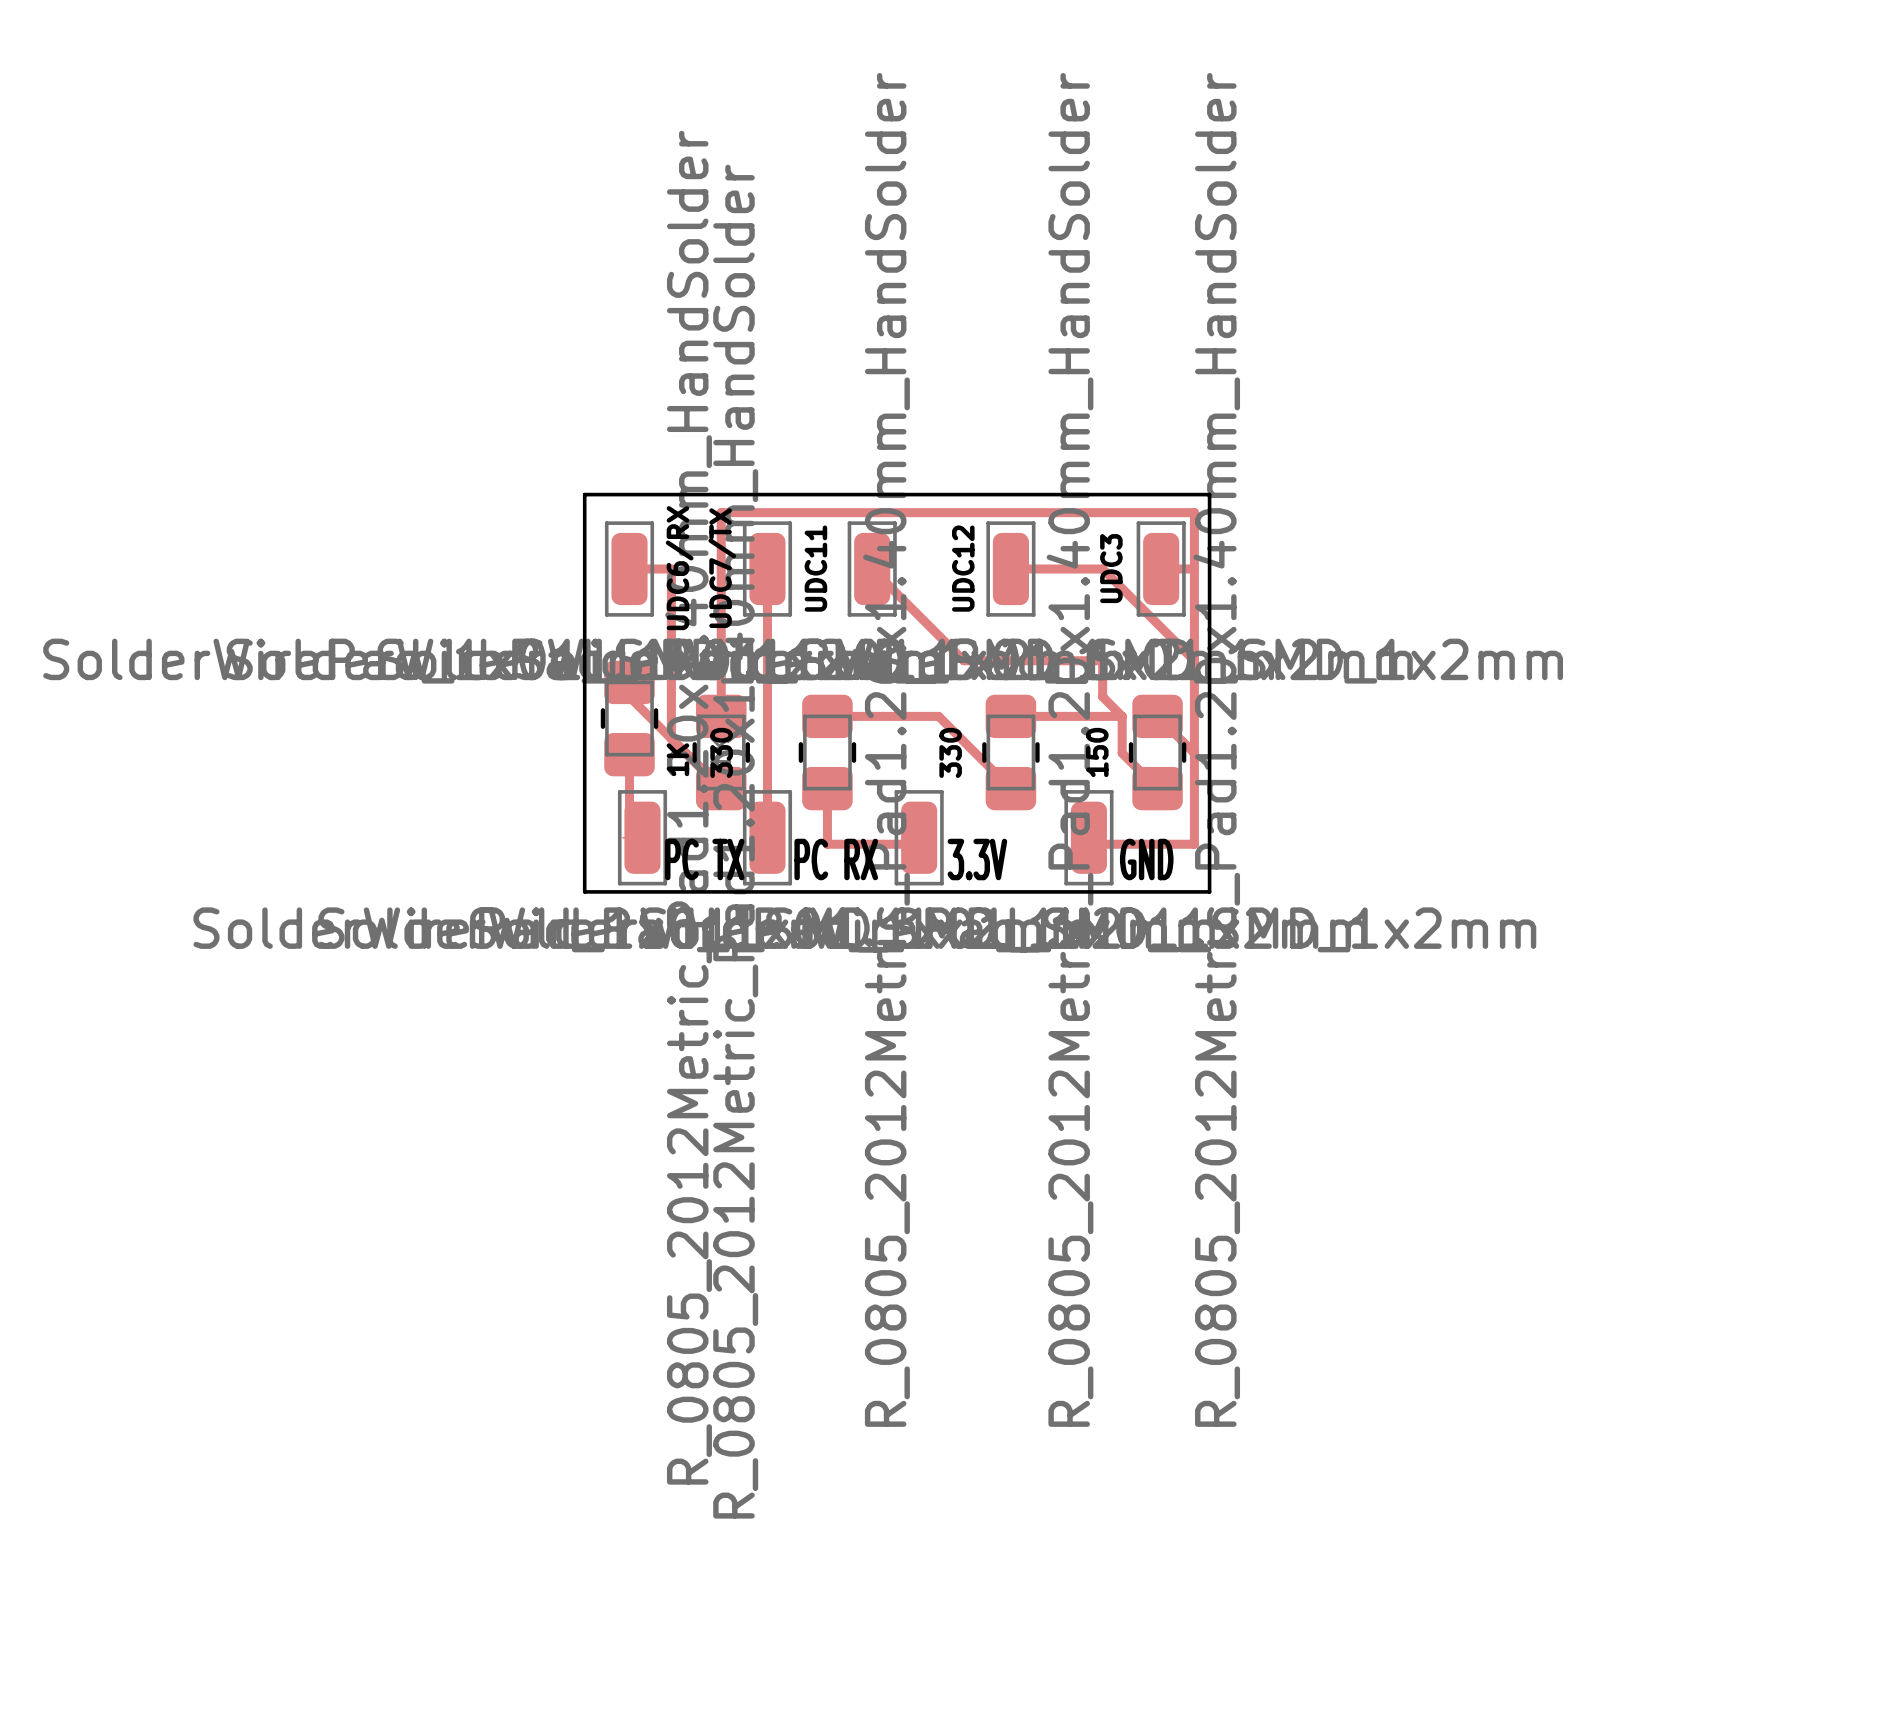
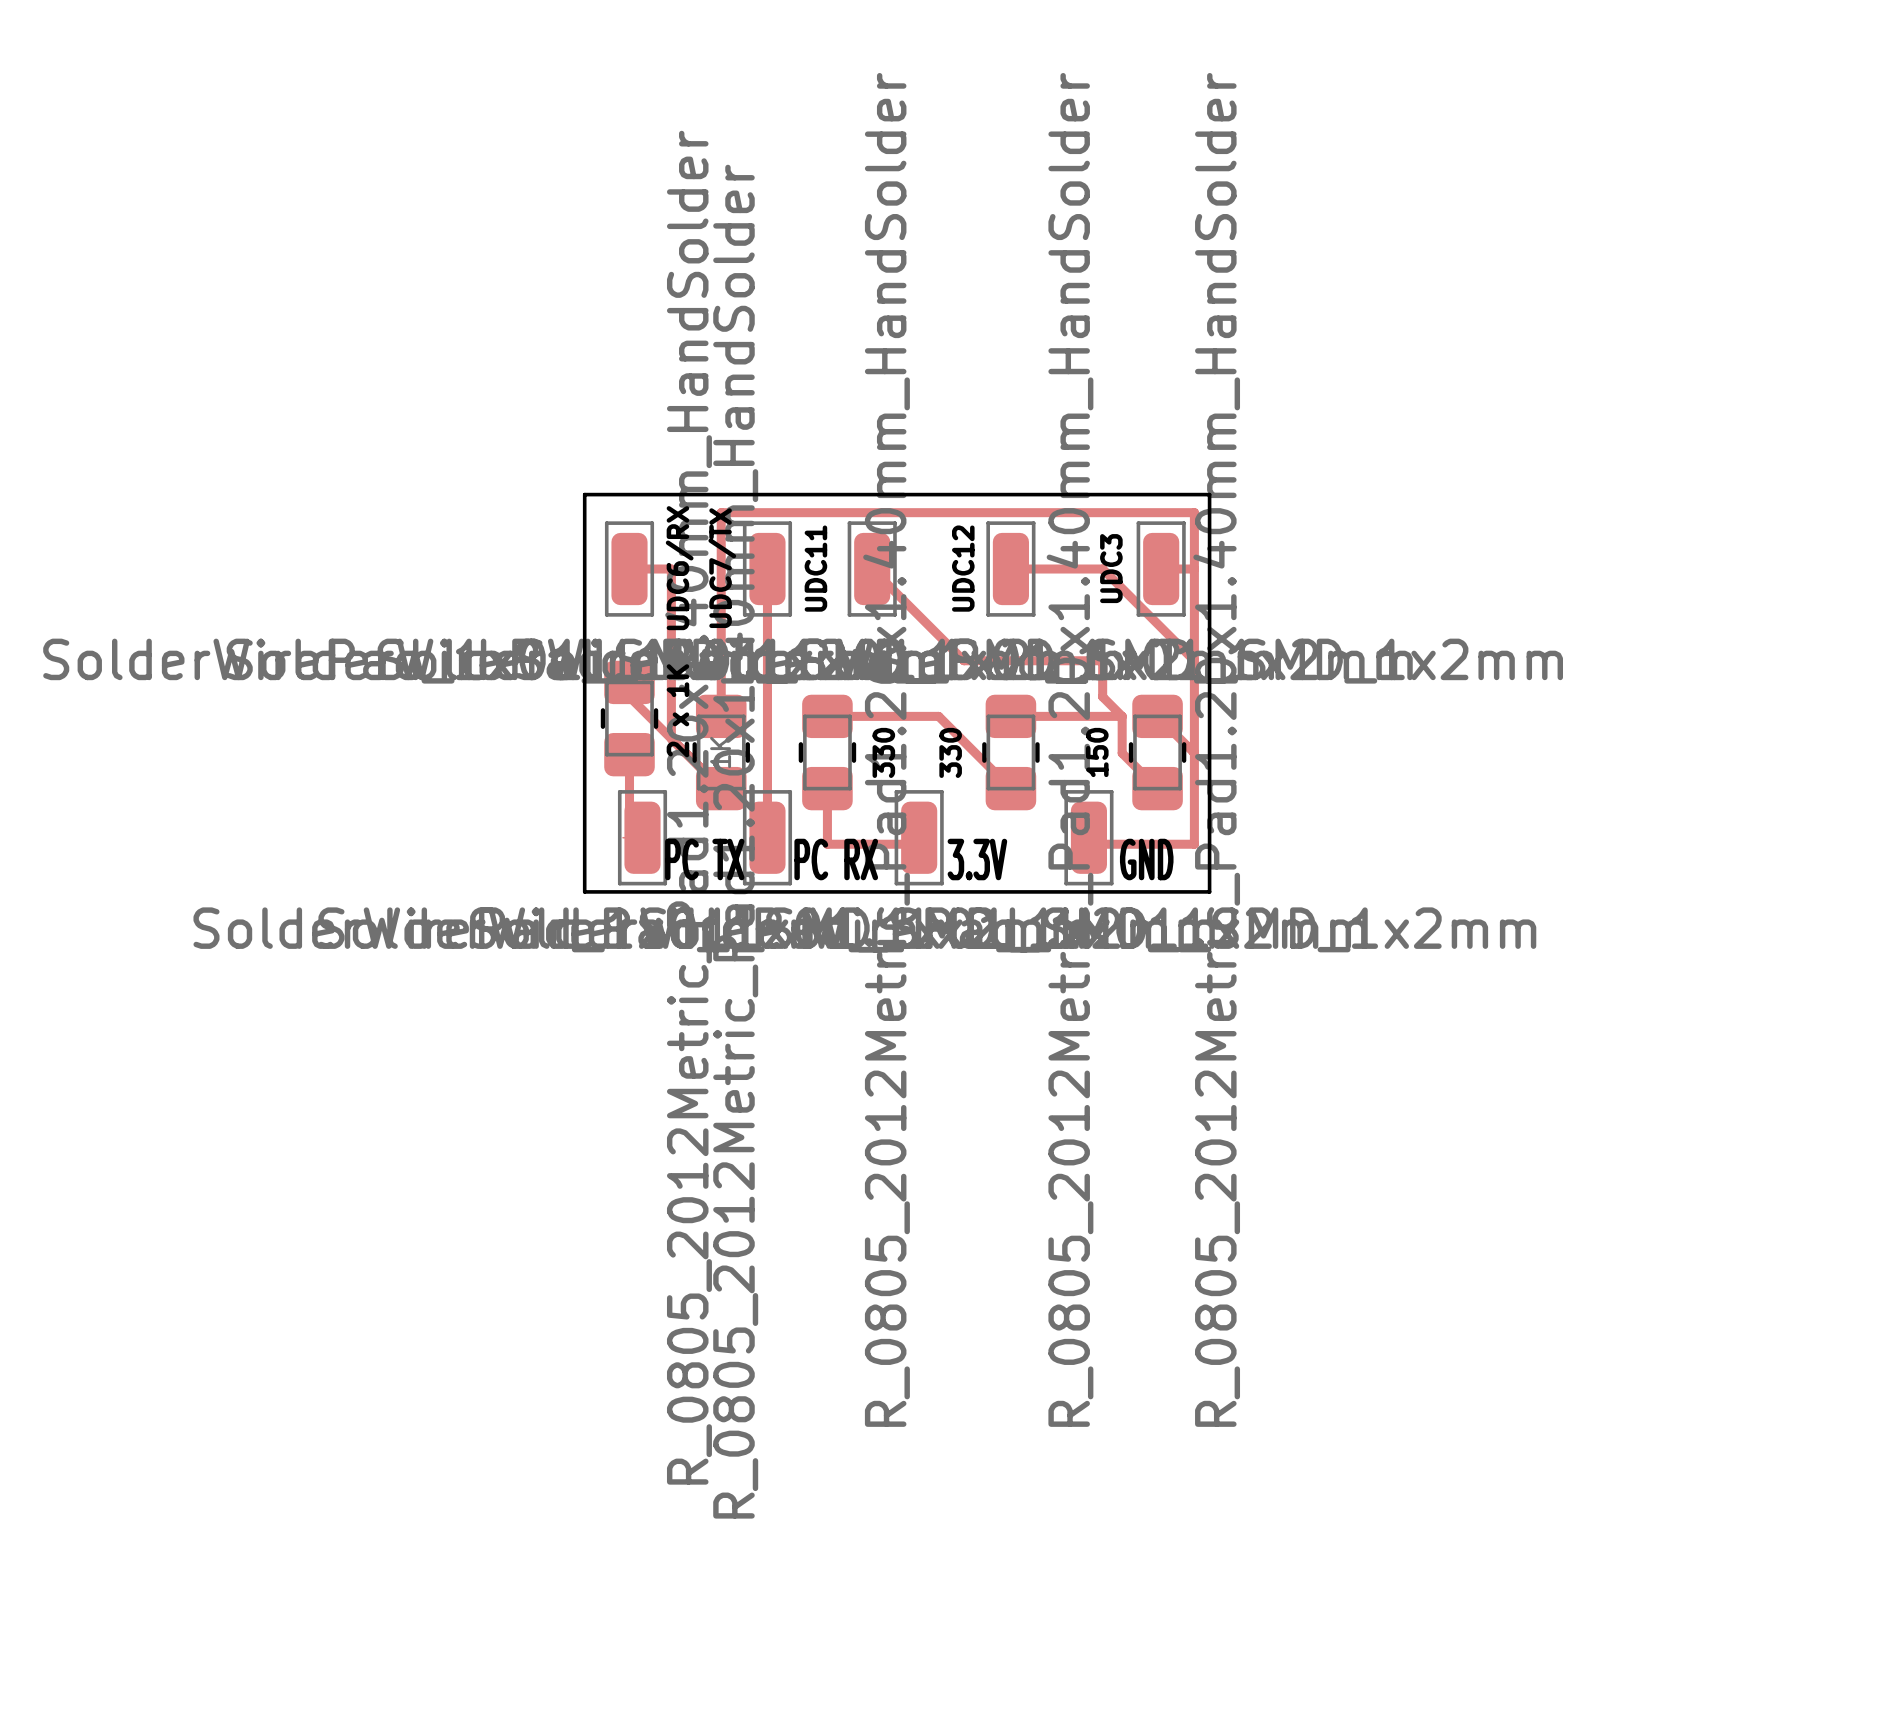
330 name position: 330 (721, 752) -> 330 (883, 752)
1K name: 1K (677, 759) -> 2 x 1K (677, 710)

